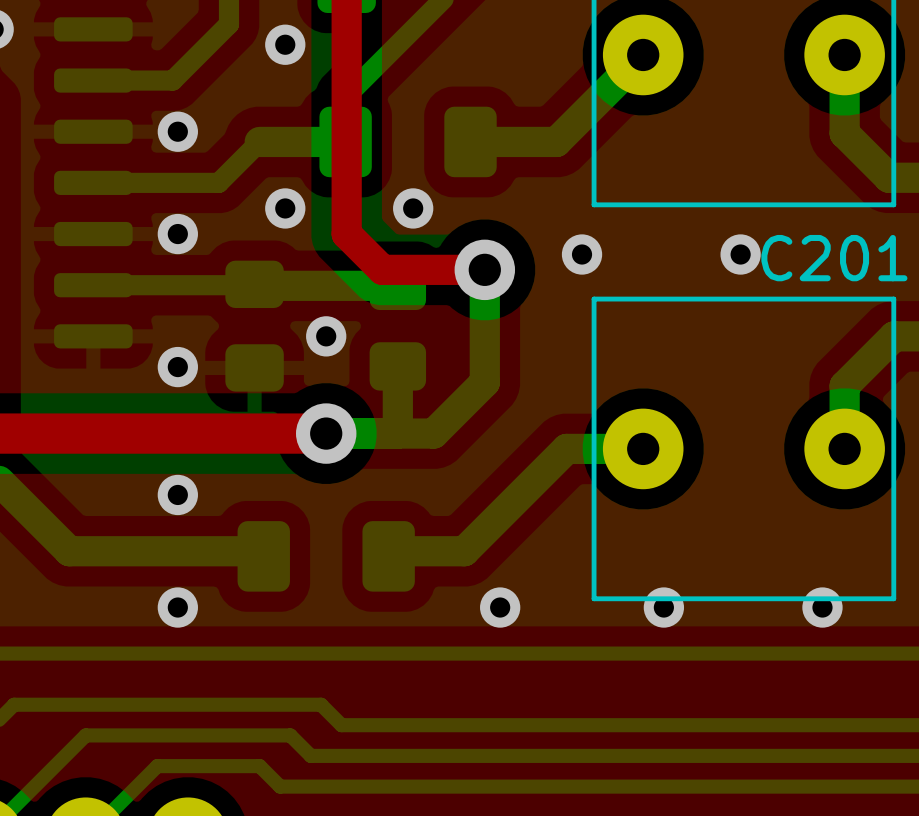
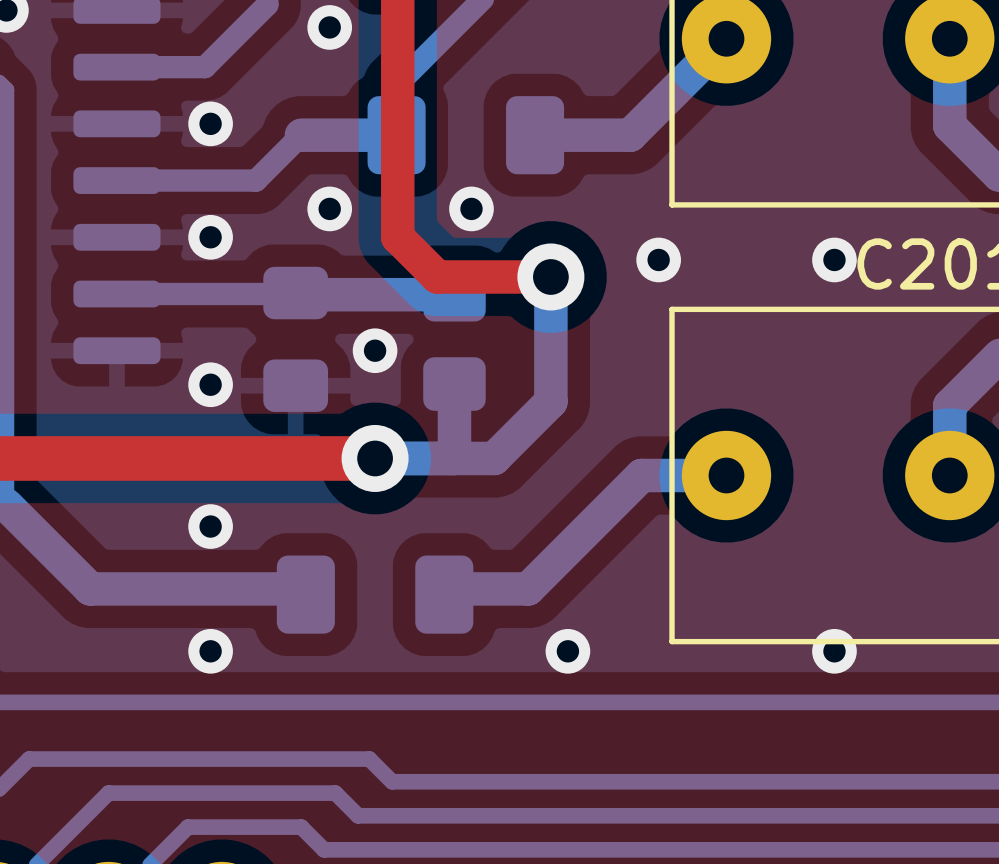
via: (663, 607) -> none
via: none -> (834, 651)
via: (822, 607) -> none

